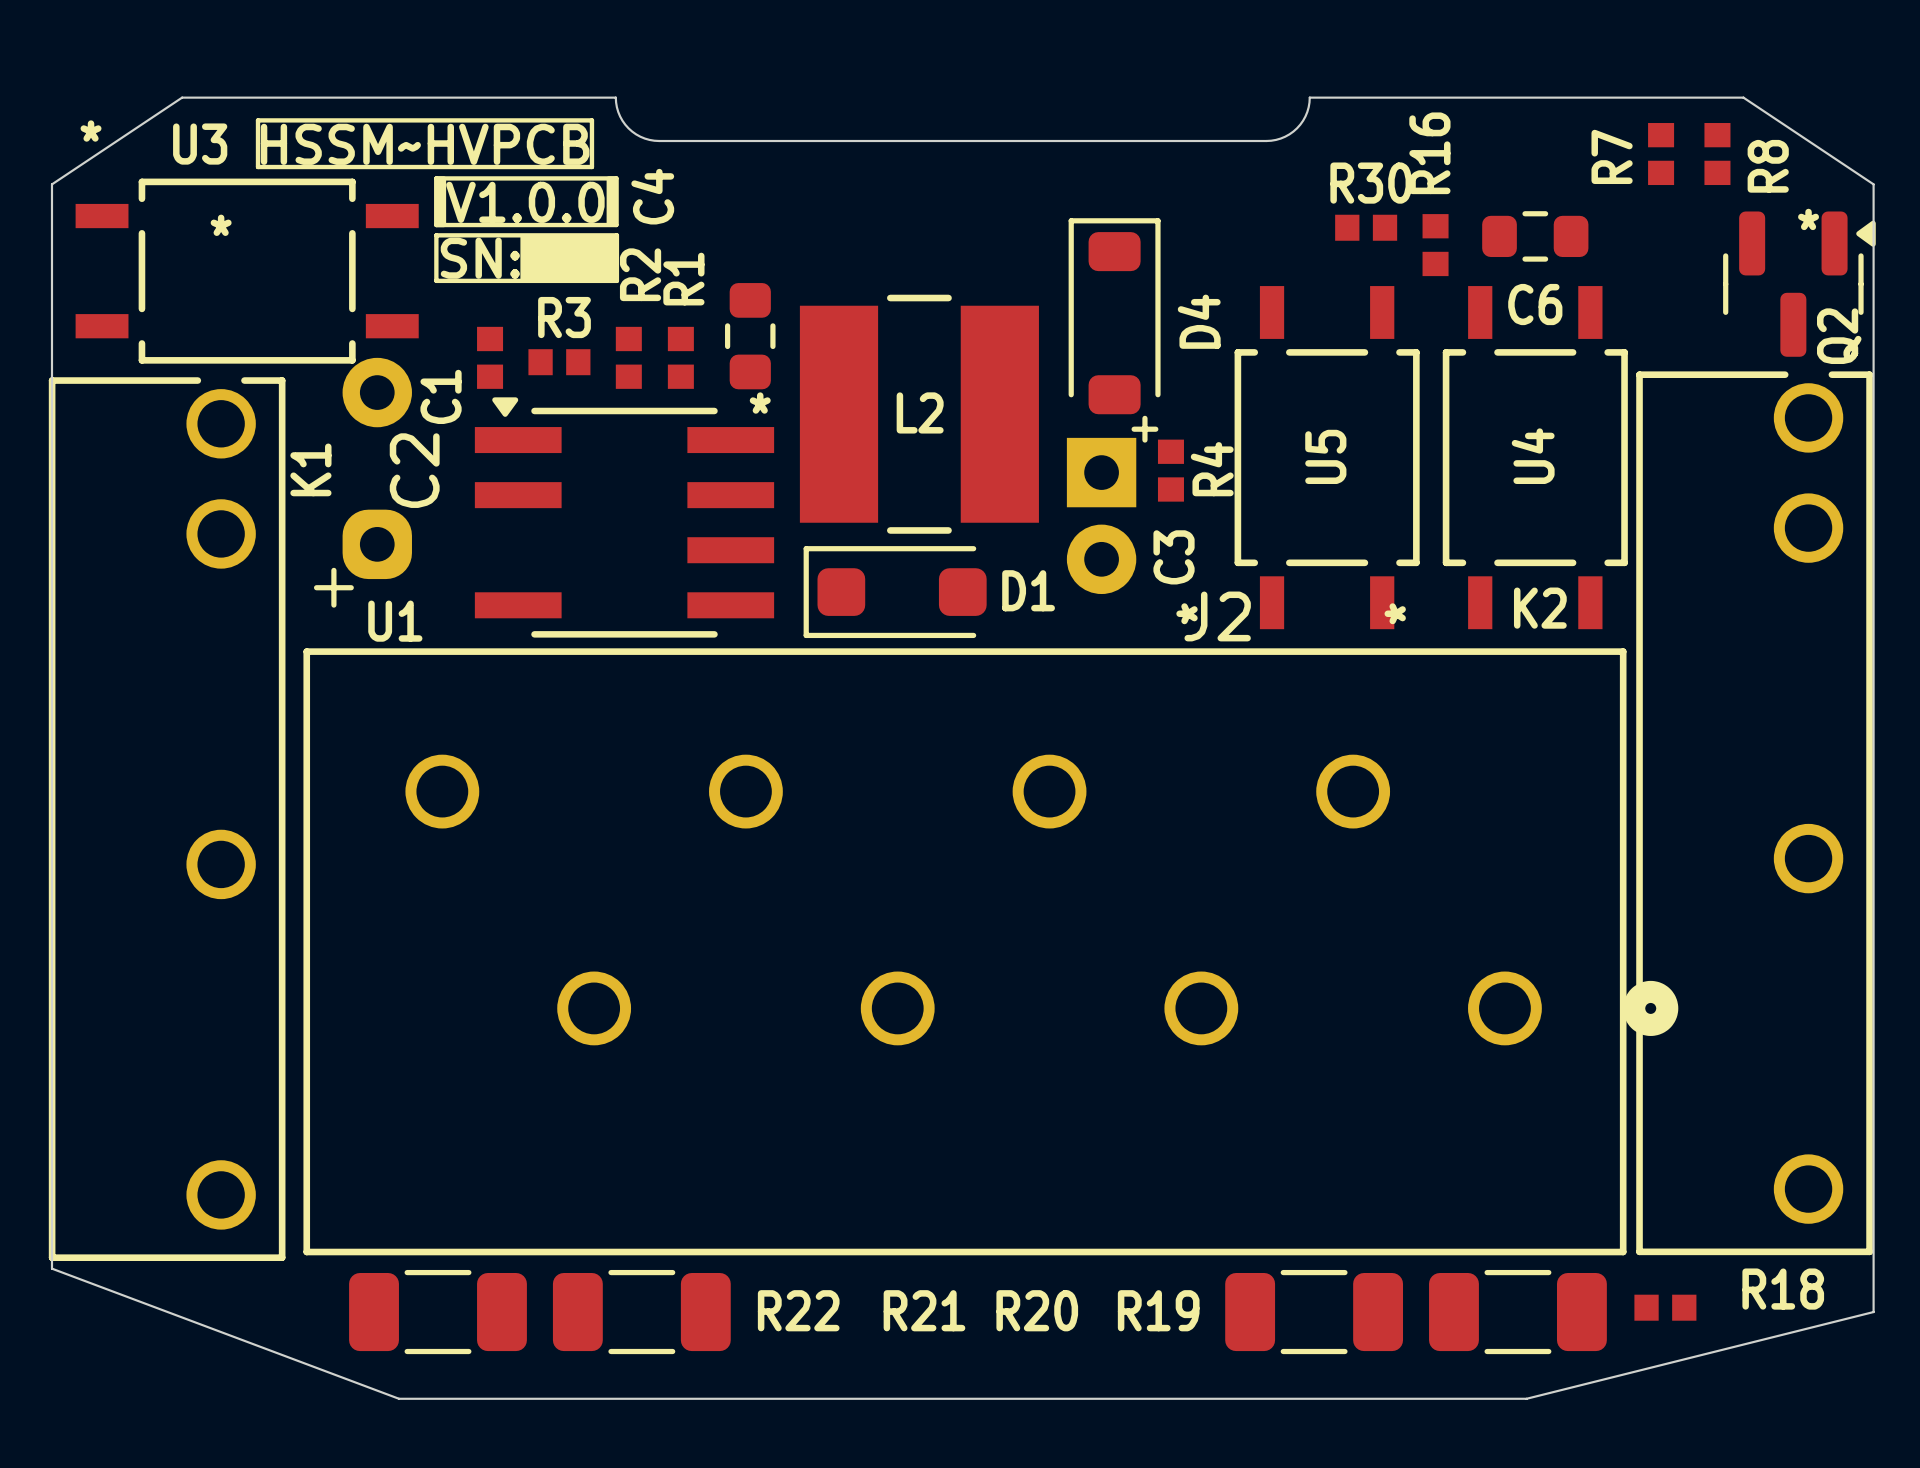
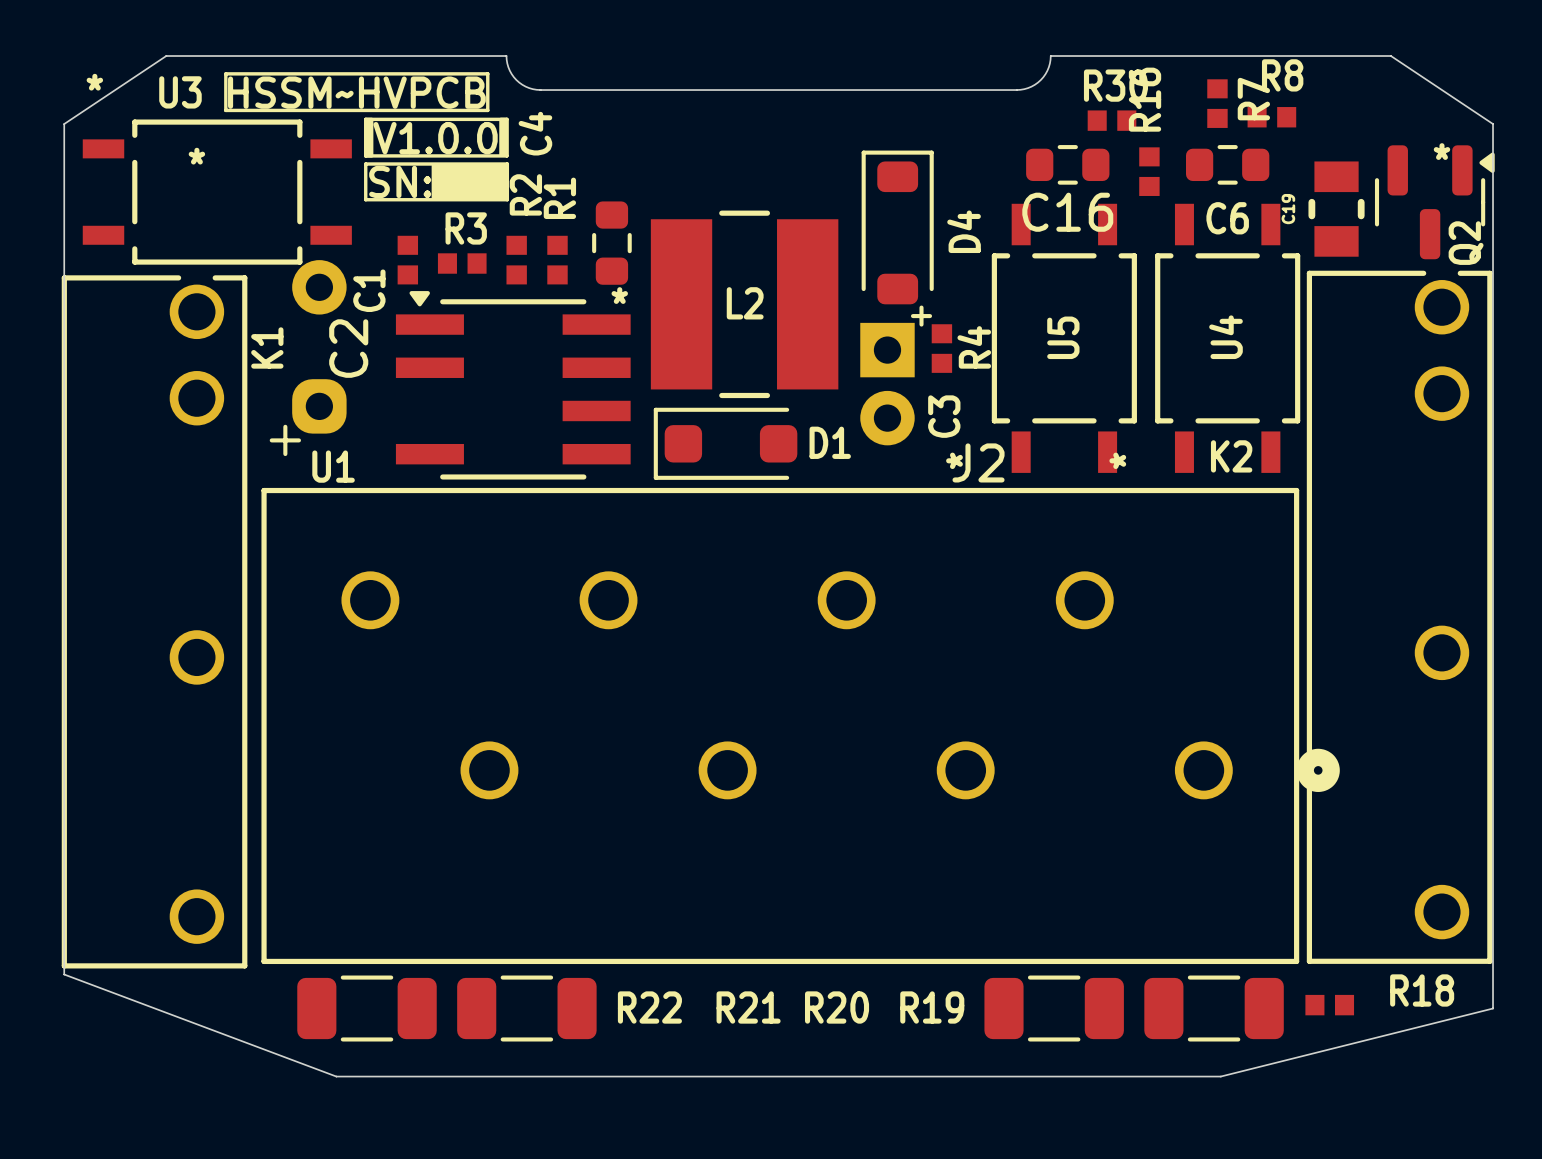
R7 position: (1661, 154) -> (1217, 103)
R8 rotation: 0° (1717, 154) -> 90° clockwise (1271, 117)
R8 position: (1717, 154) -> (1271, 117)
R7 name position: R7 (1612, 156) -> R7 (1253, 99)
R30 position: (1366, 227) -> (1112, 120)
C16: none -> (1067, 164)
C19: none -> (1336, 209)

